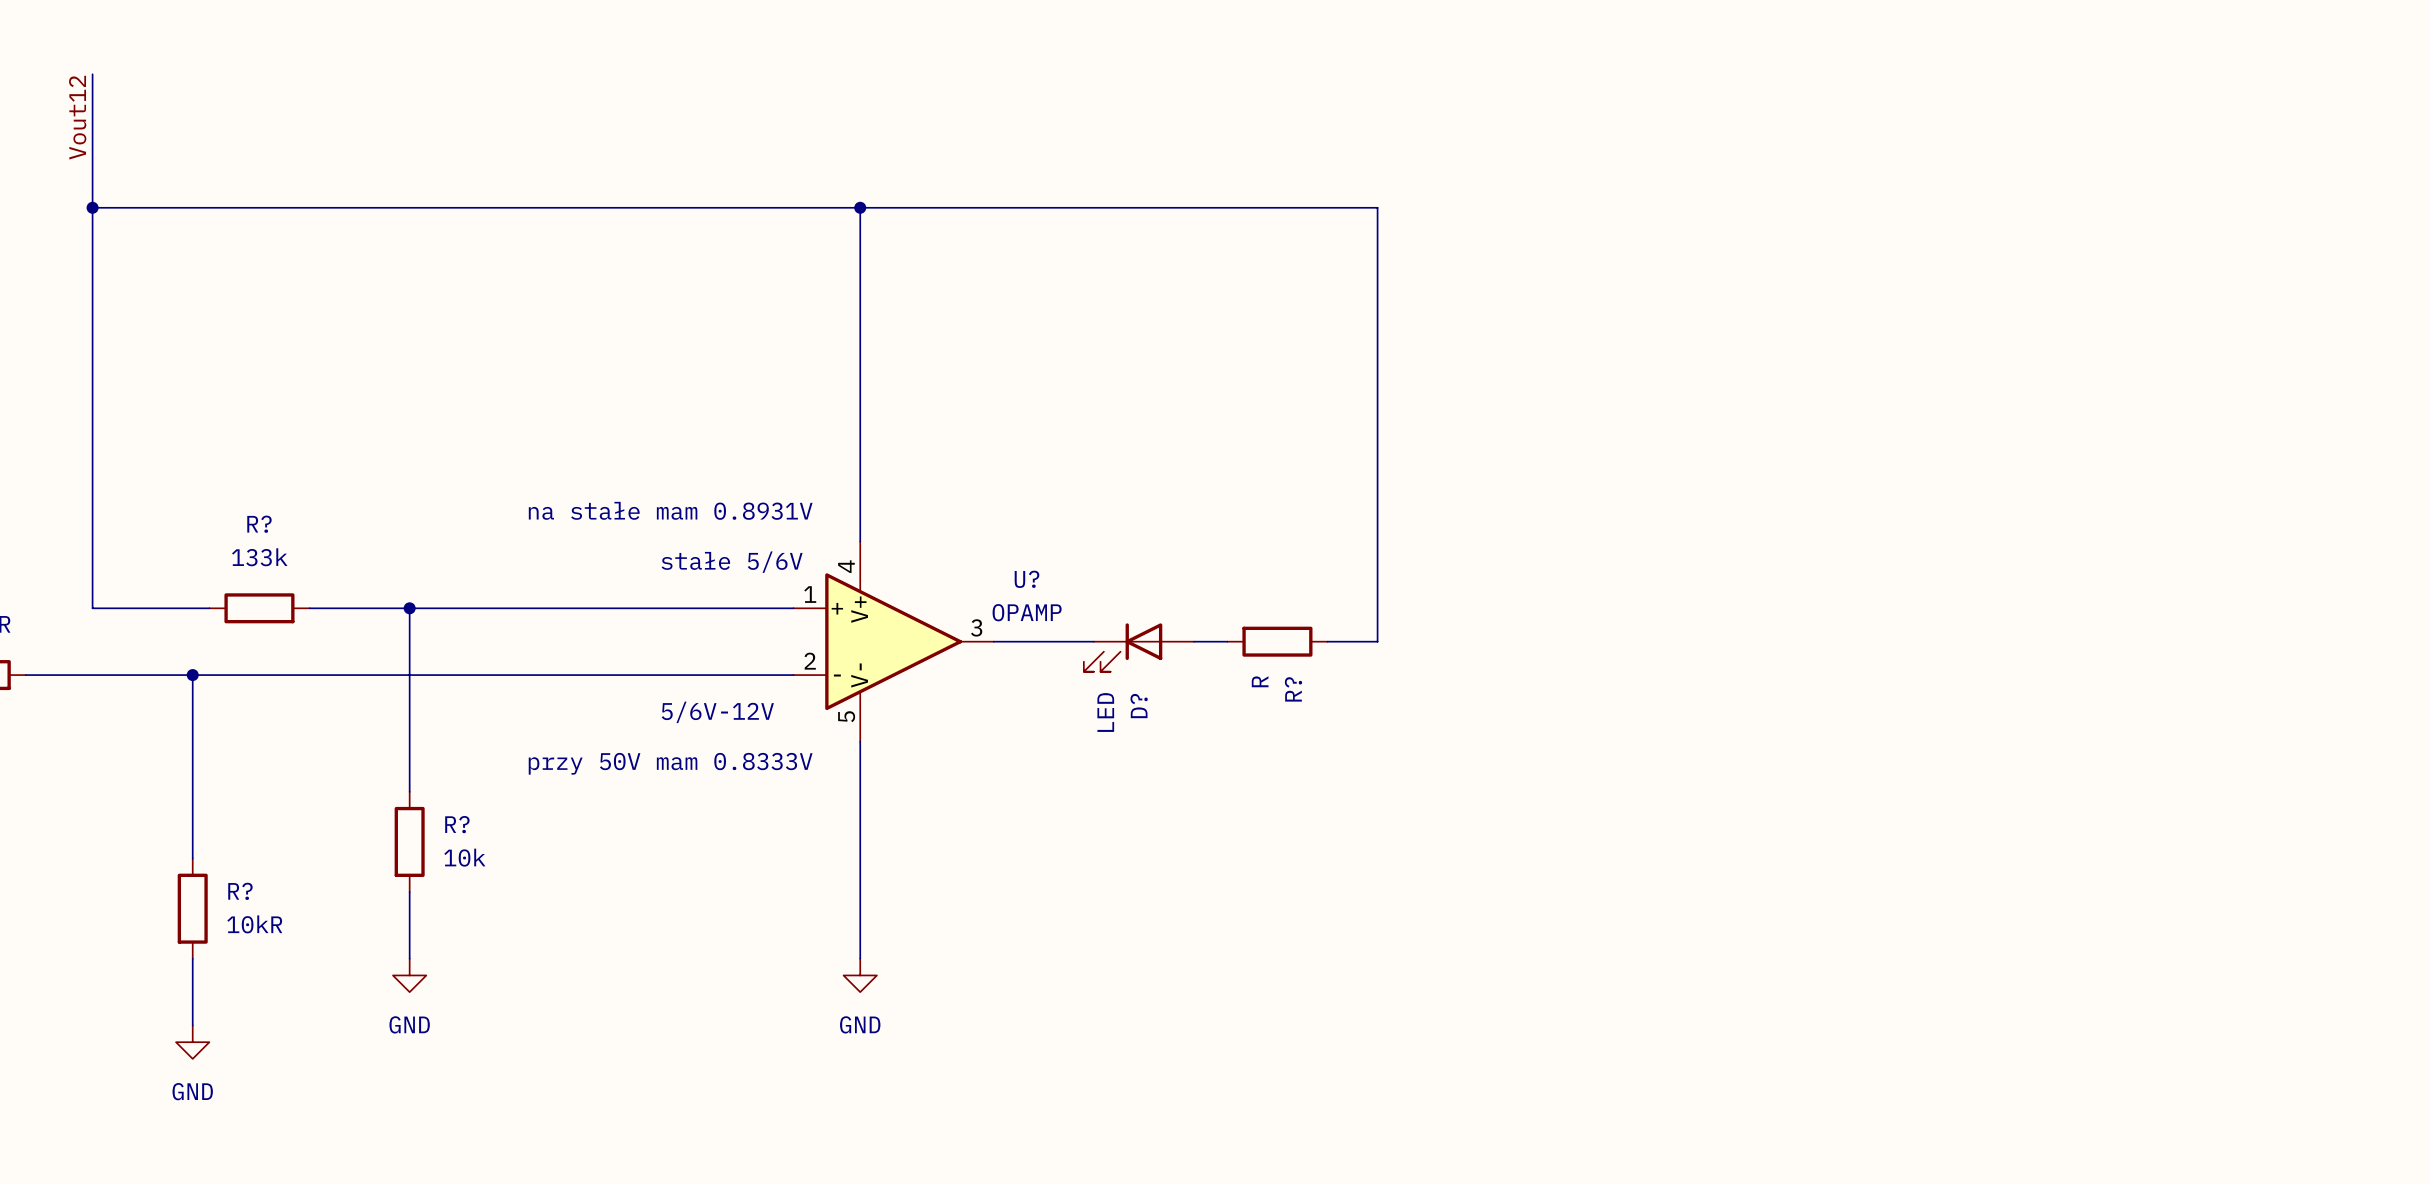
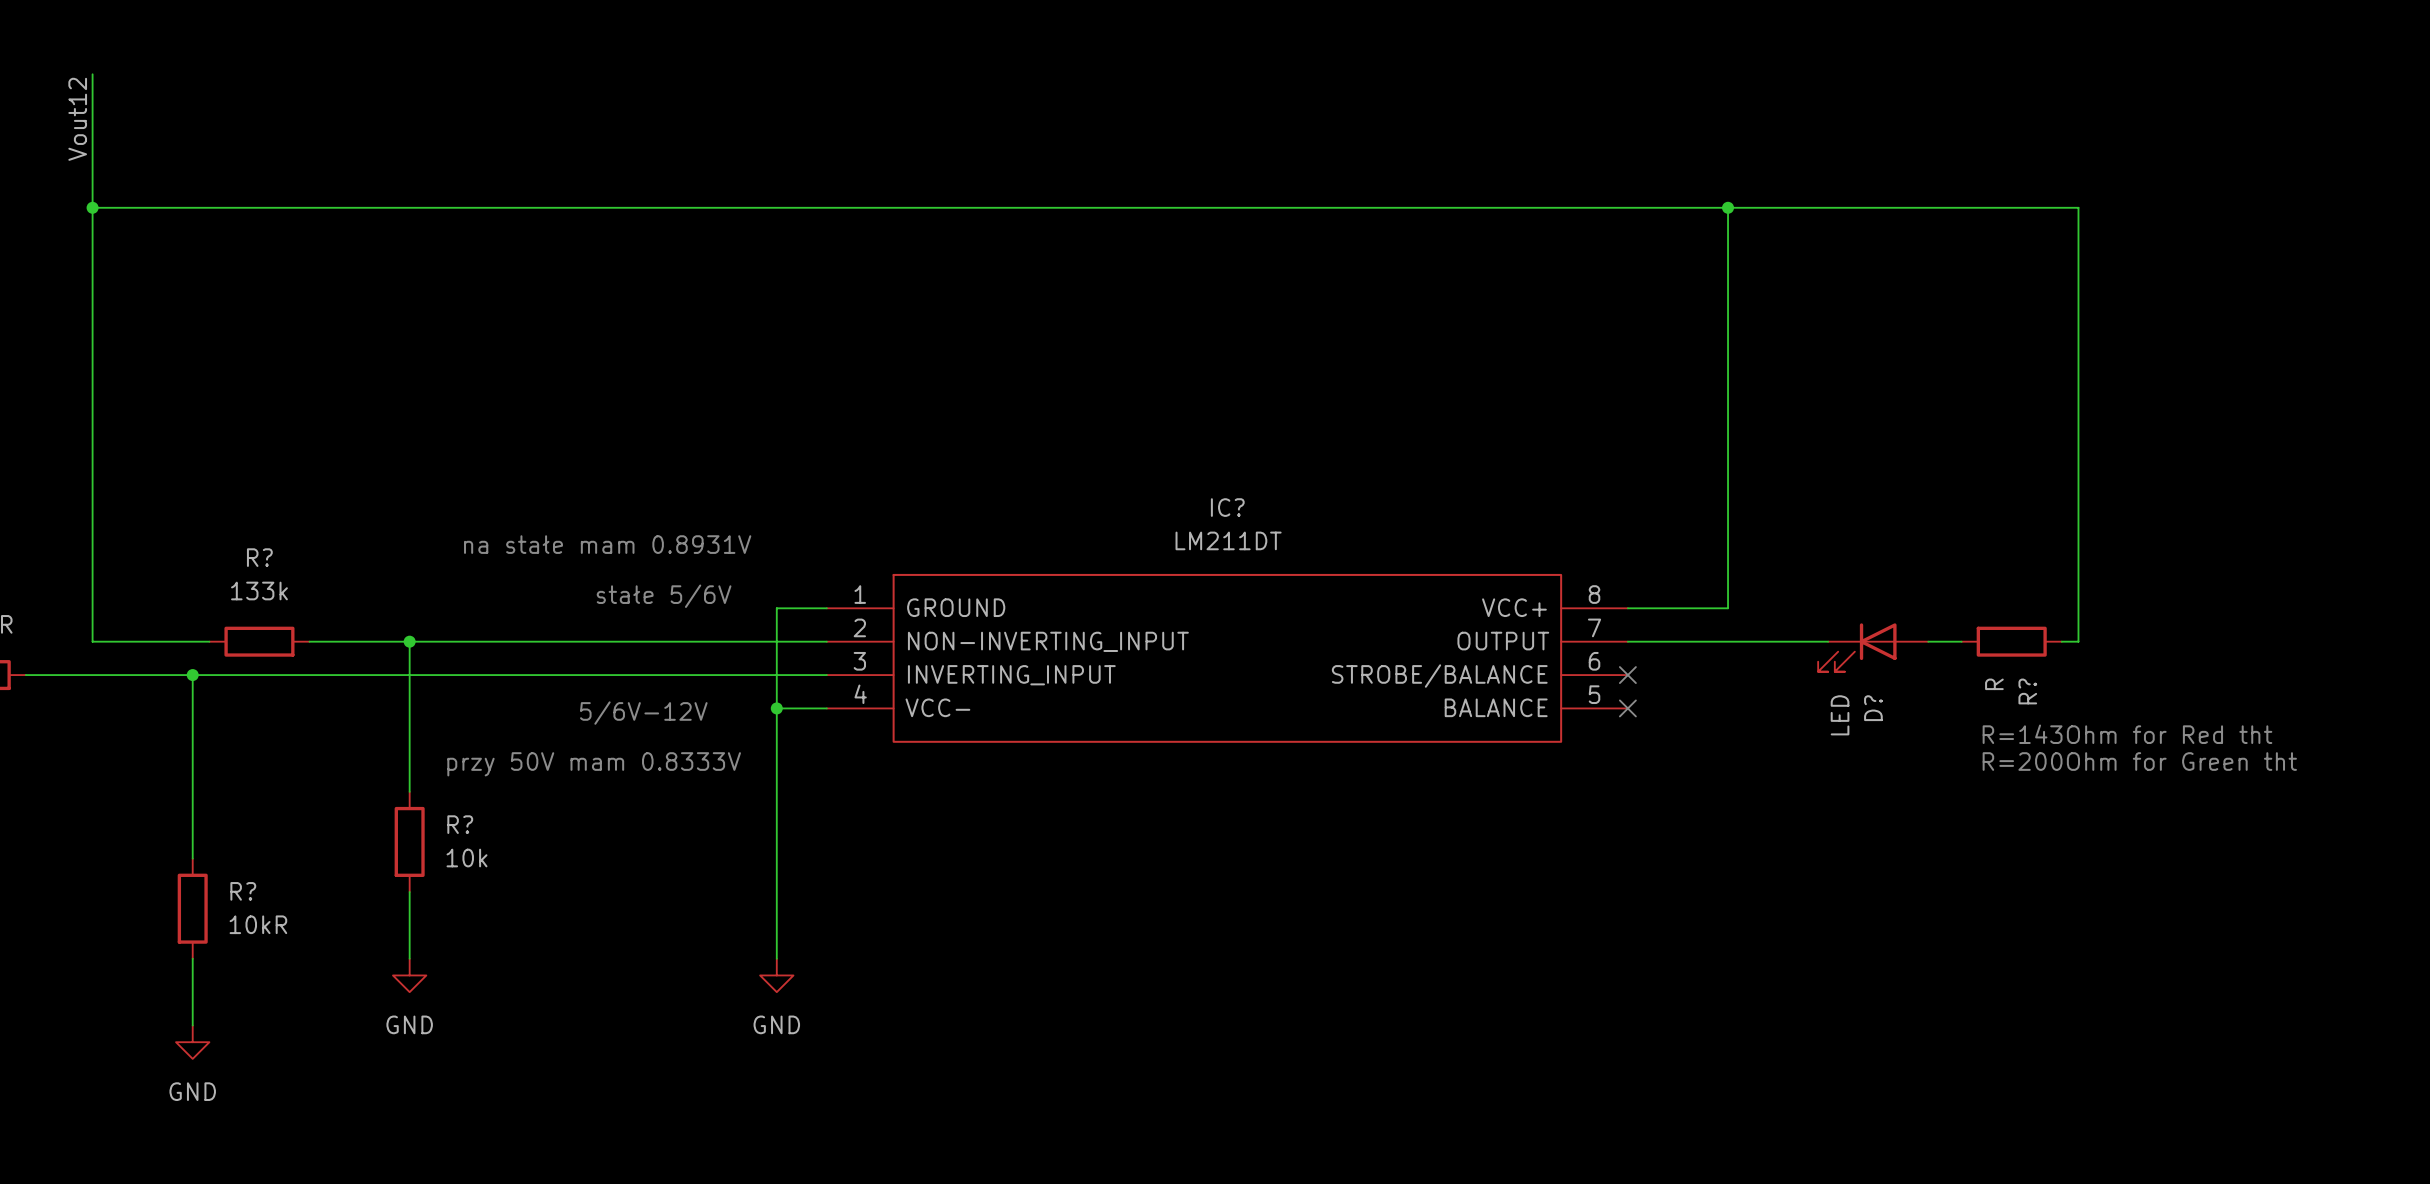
wire: (860, 207) (860, 541) -> none
junction: (860, 207) -> none
wire: (1377, 207) (1377, 641) (1327, 641) -> (1377, 207) (2078, 207) (2078, 641) (2061, 641)
wire: none -> (1728, 207) (1728, 608) (1627, 608)
junction: none -> (1728, 207)
text position: na stałe mam 0.8931V (670, 510) -> na stałe mam 0.8931V (607, 544)
text position: stałe 5/6V (732, 562) -> stałe 5/6V (664, 596)
wire: (92, 608) (209, 608) -> (92, 608) (92, 641) (209, 641)
R? position: (259, 608) -> (259, 641)
wire: (309, 608) (776, 608) -> (776, 958) (776, 608)
wire: (409, 608) (409, 641) -> none
junction position: (409, 608) -> (409, 641)
wire: none -> (309, 641) (826, 641)
U?: OPAMP (893, 641) -> none
wire: (993, 641) (1093, 641) -> none
wire: (1194, 641) (1227, 641) -> none
R?: R (1277, 641) -> none
wire: none -> (1627, 641) (1828, 641)
wire: none -> (1928, 641) (1961, 641)
R?: none -> R (2011, 641)
D?: LED (1138, 647) -> none
D?: none -> LED (1873, 647)
IC?: none -> LM211DT (1227, 658)
no-connect mark: none -> (1627, 675)
wire: none -> (776, 708) (826, 708)
junction: none -> (776, 708)
no-connect mark: none -> (1627, 708)
text position: 5/6V-12V (717, 712) -> 5/6V-12V (643, 713)
text: none -> R=143Ohm for Red tht (2127, 734)
wire: (860, 741) (860, 958) -> none
text: none -> R=200Ohm for Green tht (2139, 761)
text position: przy 50V mam 0.8333V (670, 763) -> przy 50V mam 0.8333V (594, 764)
power symbol position: GND (860, 975) -> GND (776, 975)

